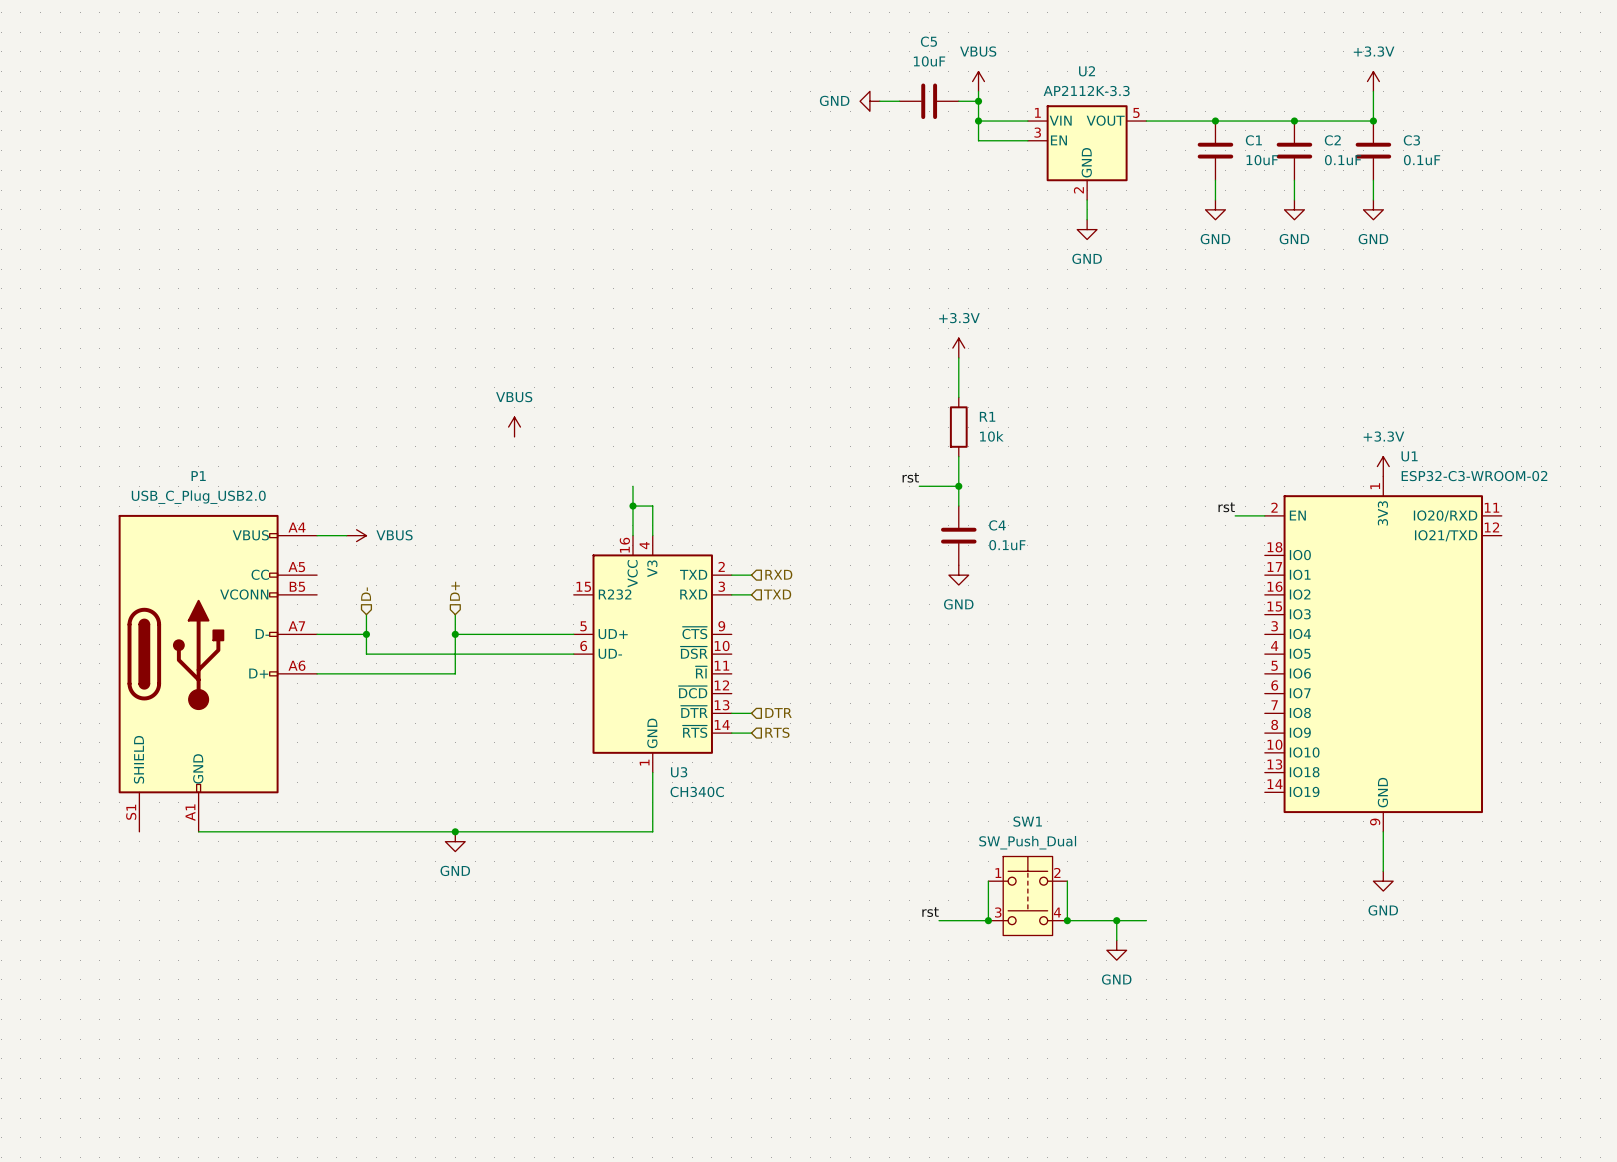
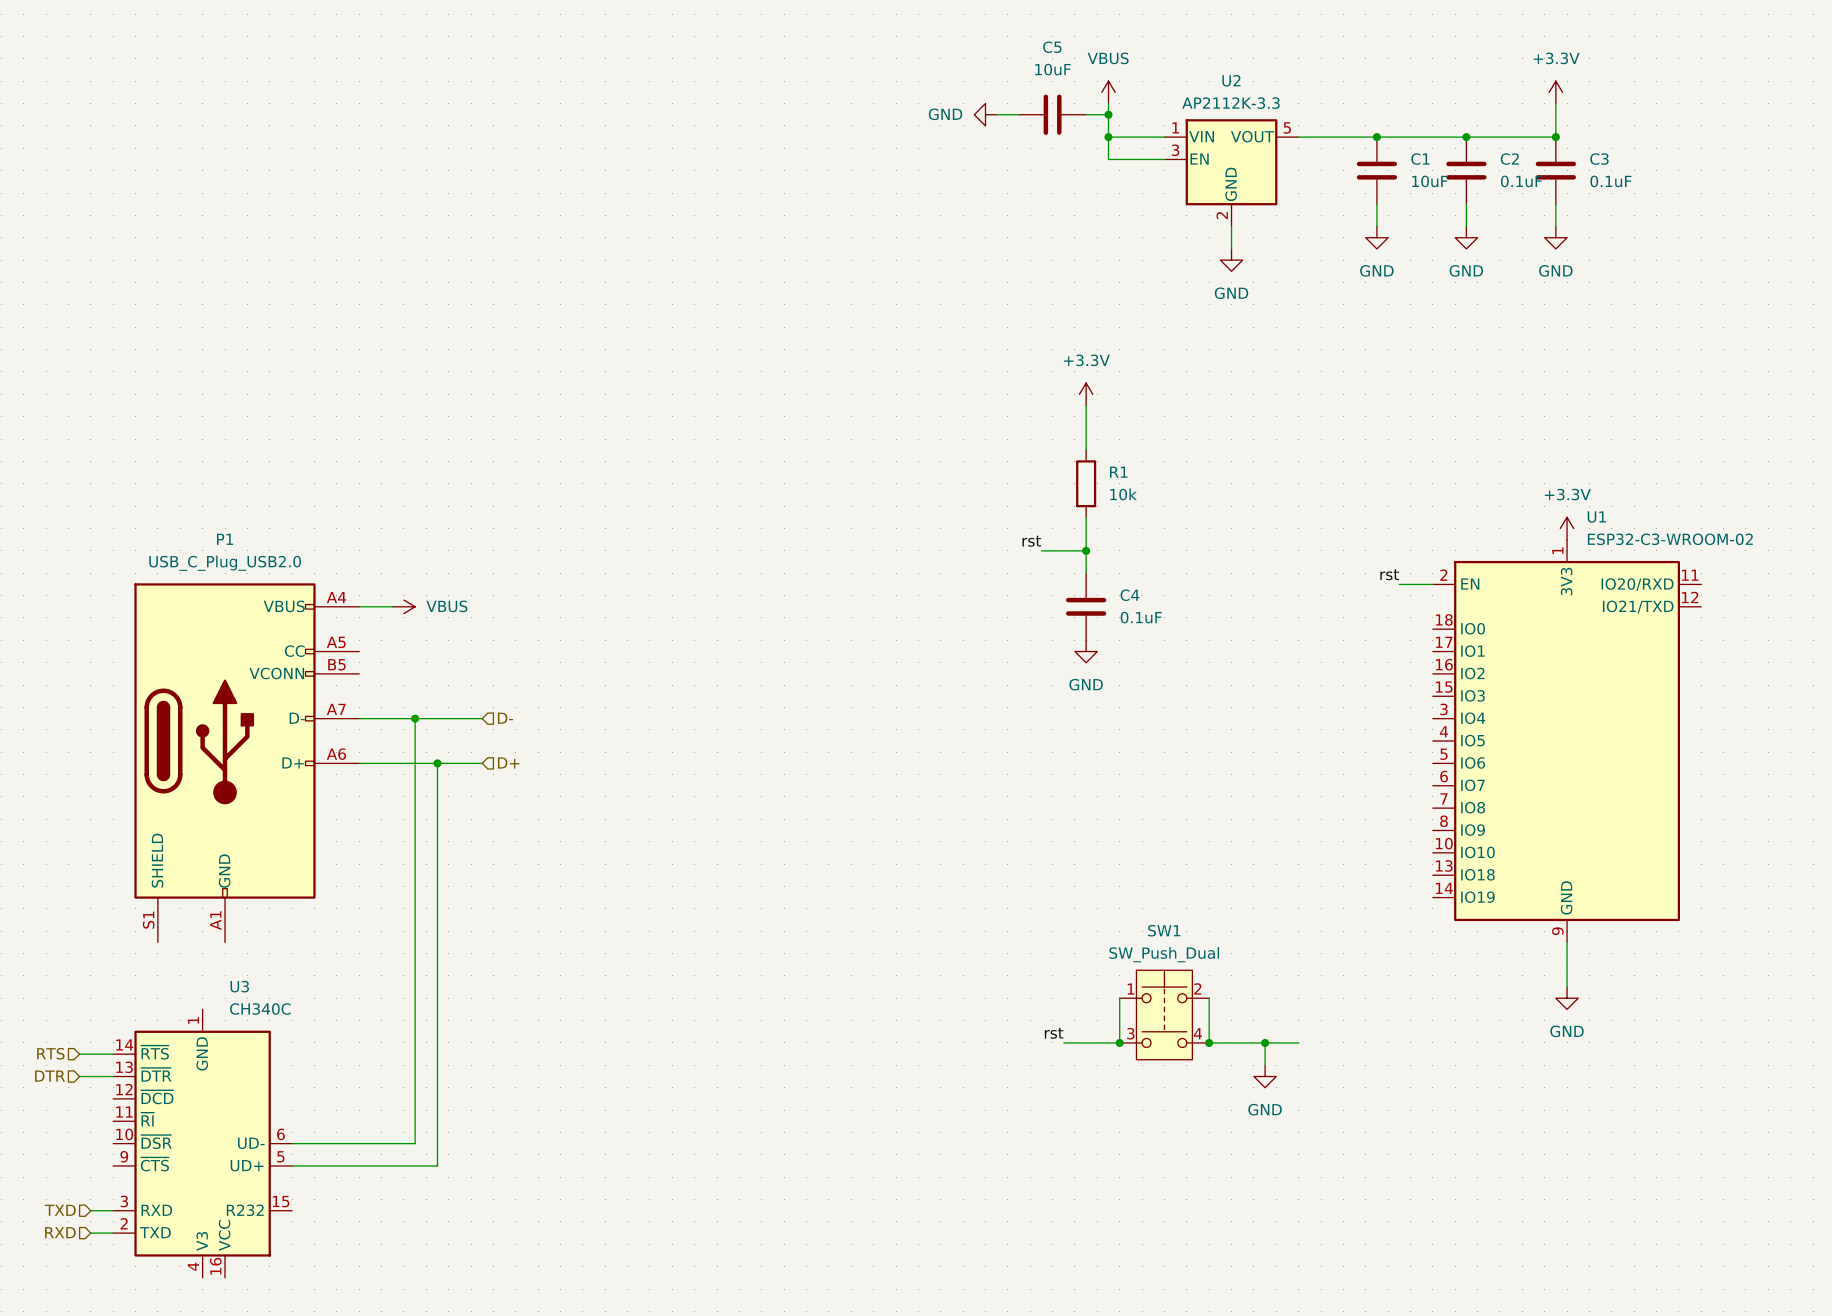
power symbol: VBUS (514, 427) -> none
wire: (632, 486) (632, 535) -> none
wire: (632, 506) (652, 506) (652, 535) -> none
junction: (632, 506) -> none
hierarchical label: RXD (778, 574) -> none
wire: (731, 575) (751, 575) -> none
hierarchical label rotation: 0° (454, 591) -> 90° clockwise (508, 762)
hierarchical label position: D+ (454, 591) -> D+ (508, 762)
hierarchical label rotation: 0° (366, 594) -> 90° clockwise (505, 718)
hierarchical label position: D- (366, 594) -> D- (505, 718)
wire: (731, 594) (751, 594) -> none
hierarchical label: TXD (777, 594) -> none
wire: (366, 614) (366, 634) -> (482, 718) (415, 718)
wire: (455, 614) (455, 673) (425, 673) -> none
wire: (455, 634) (573, 634) -> none
junction: (455, 634) -> none
wire: (366, 654) (573, 654) -> (415, 741) (415, 1143) (292, 1143)
U3 rotation: 0° (652, 654) -> 180° (202, 1143)
U3 position: (652, 654) -> (202, 1143)
wire: none -> (437, 763) (437, 1165) (292, 1165)
junction: none -> (437, 763)
hierarchical label: DTR (778, 712) -> none
wire: (731, 713) (751, 713) -> none
hierarchical label: RTS (777, 732) -> none
wire: (731, 733) (751, 733) -> none
wire: (652, 772) (652, 831) (198, 831) -> none
U3 name position: U3 (679, 772) -> U3 (239, 986)
U3 value position: CH340C (697, 791) -> CH340C (260, 1009)
junction: (455, 831) -> none
power symbol: GND (455, 841) -> none
hierarchical label: none -> RTS (50, 1053)
wire: none -> (79, 1054) (113, 1054)
hierarchical label: none -> DTR (50, 1076)
wire: none -> (79, 1076) (113, 1076)
hierarchical label: none -> TXD (60, 1210)
wire: none -> (90, 1210) (113, 1210)
hierarchical label: none -> RXD (60, 1232)
wire: none -> (90, 1233) (113, 1233)

